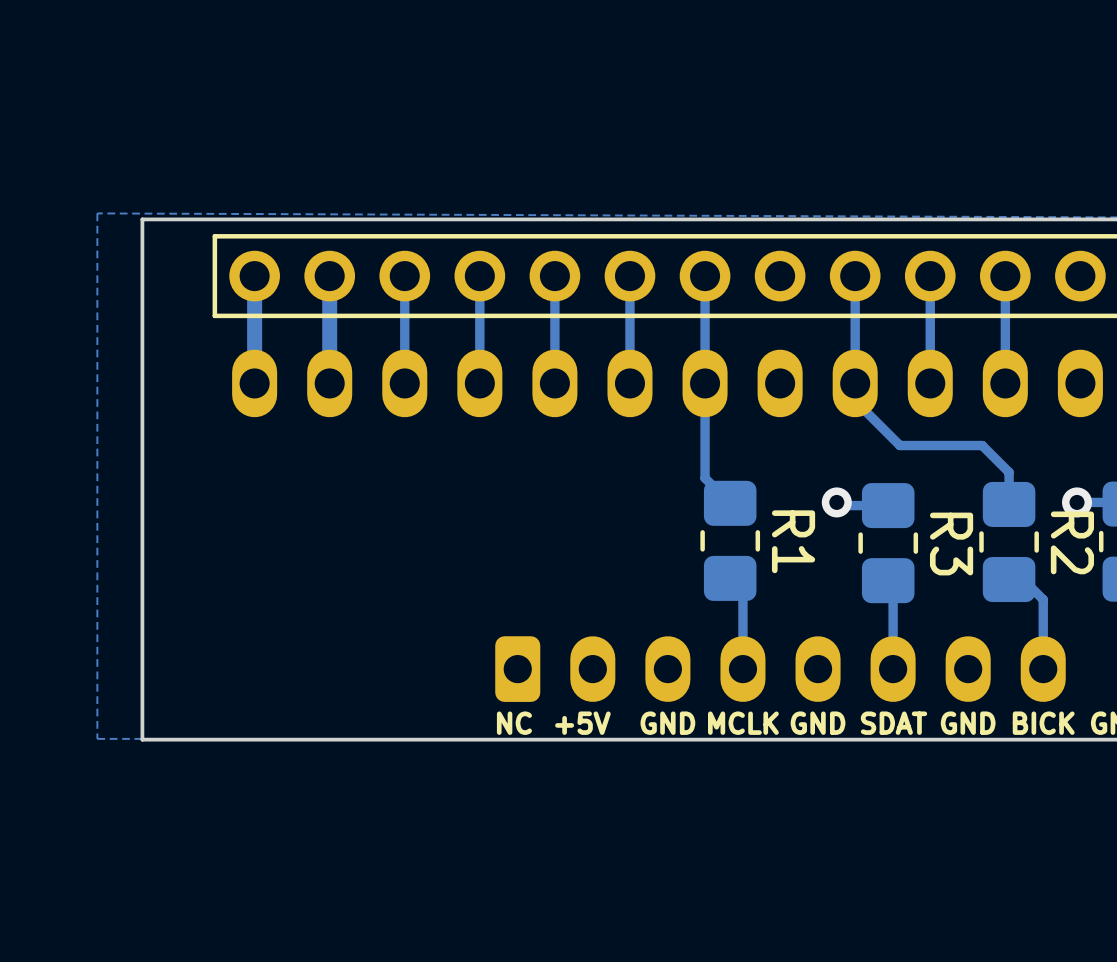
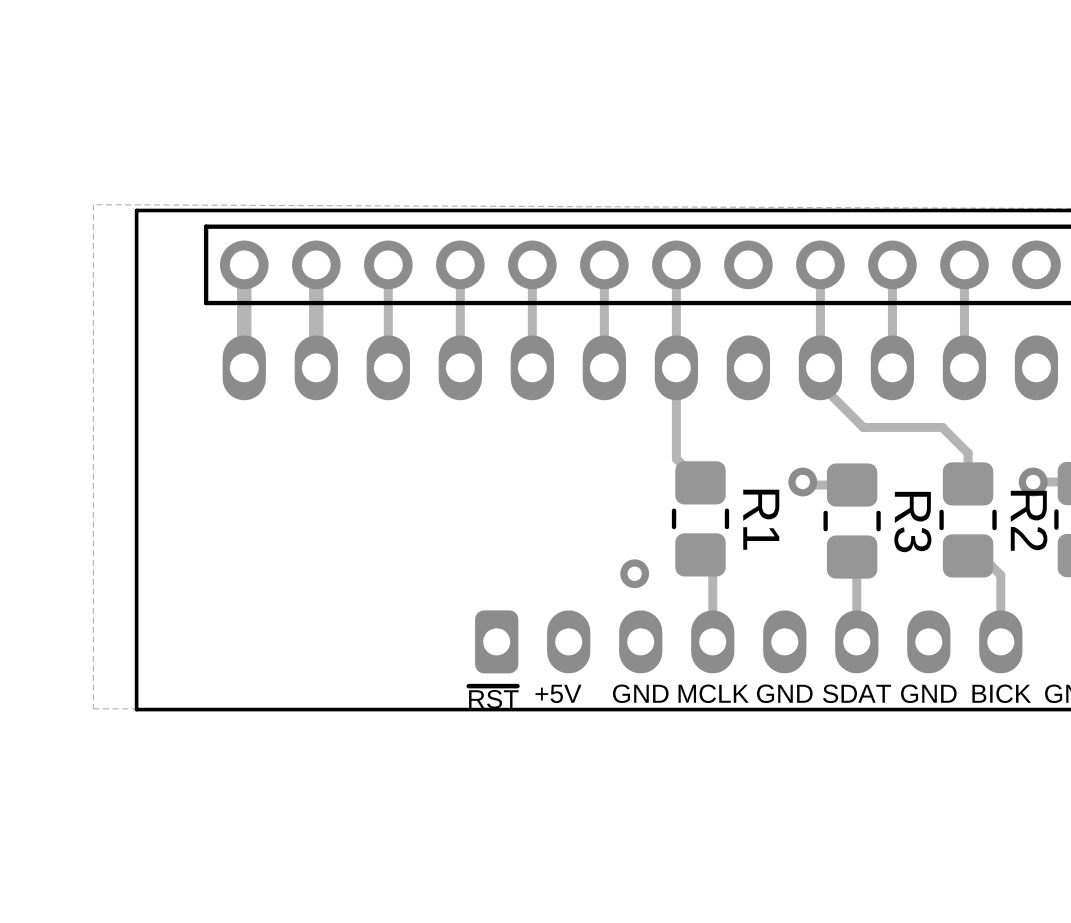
via: none -> (634, 573)
text: NC (514, 723) -> ~{RST} (493, 697)

